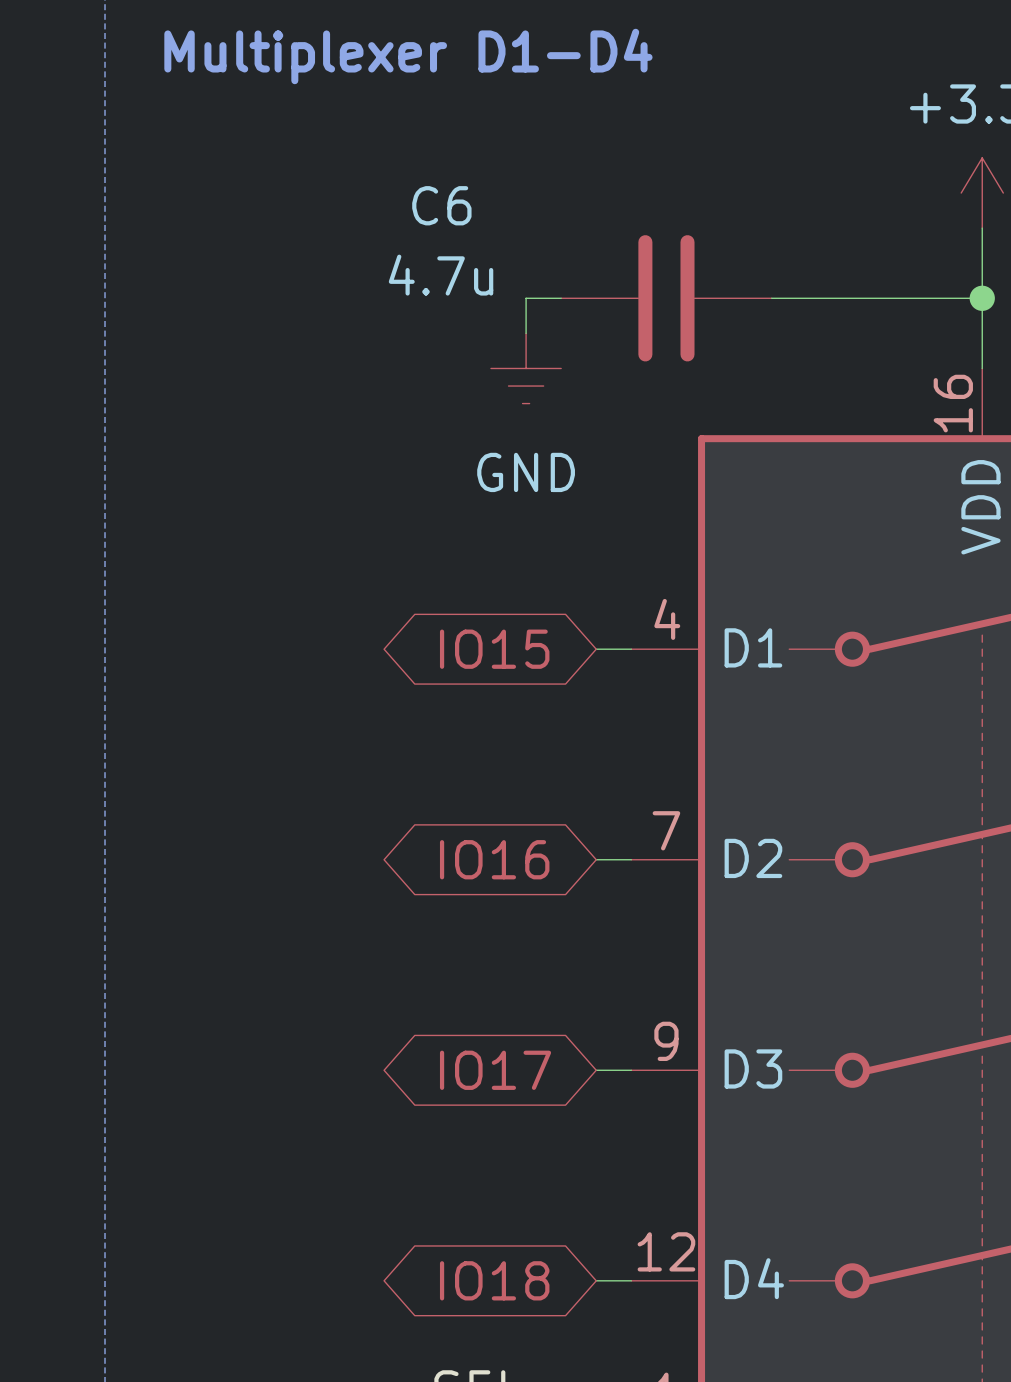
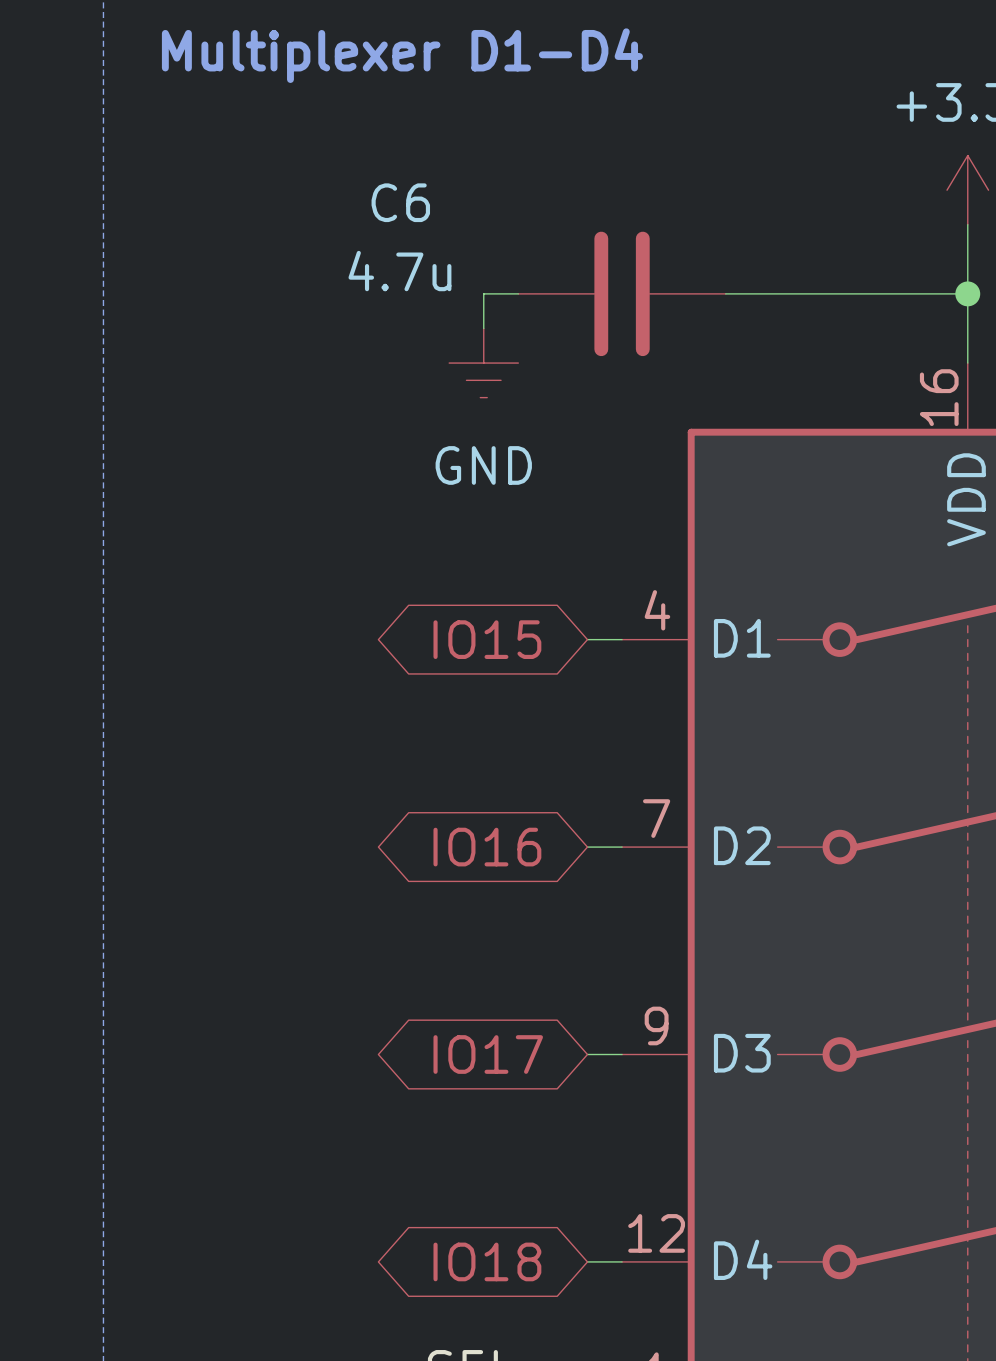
wire: (561, 298) (526, 298) (526, 333) -> (518, 293) (483, 293) (483, 328)
C6 position: (666, 298) -> (622, 293)
power symbol position: GND (526, 368) -> GND (483, 363)

